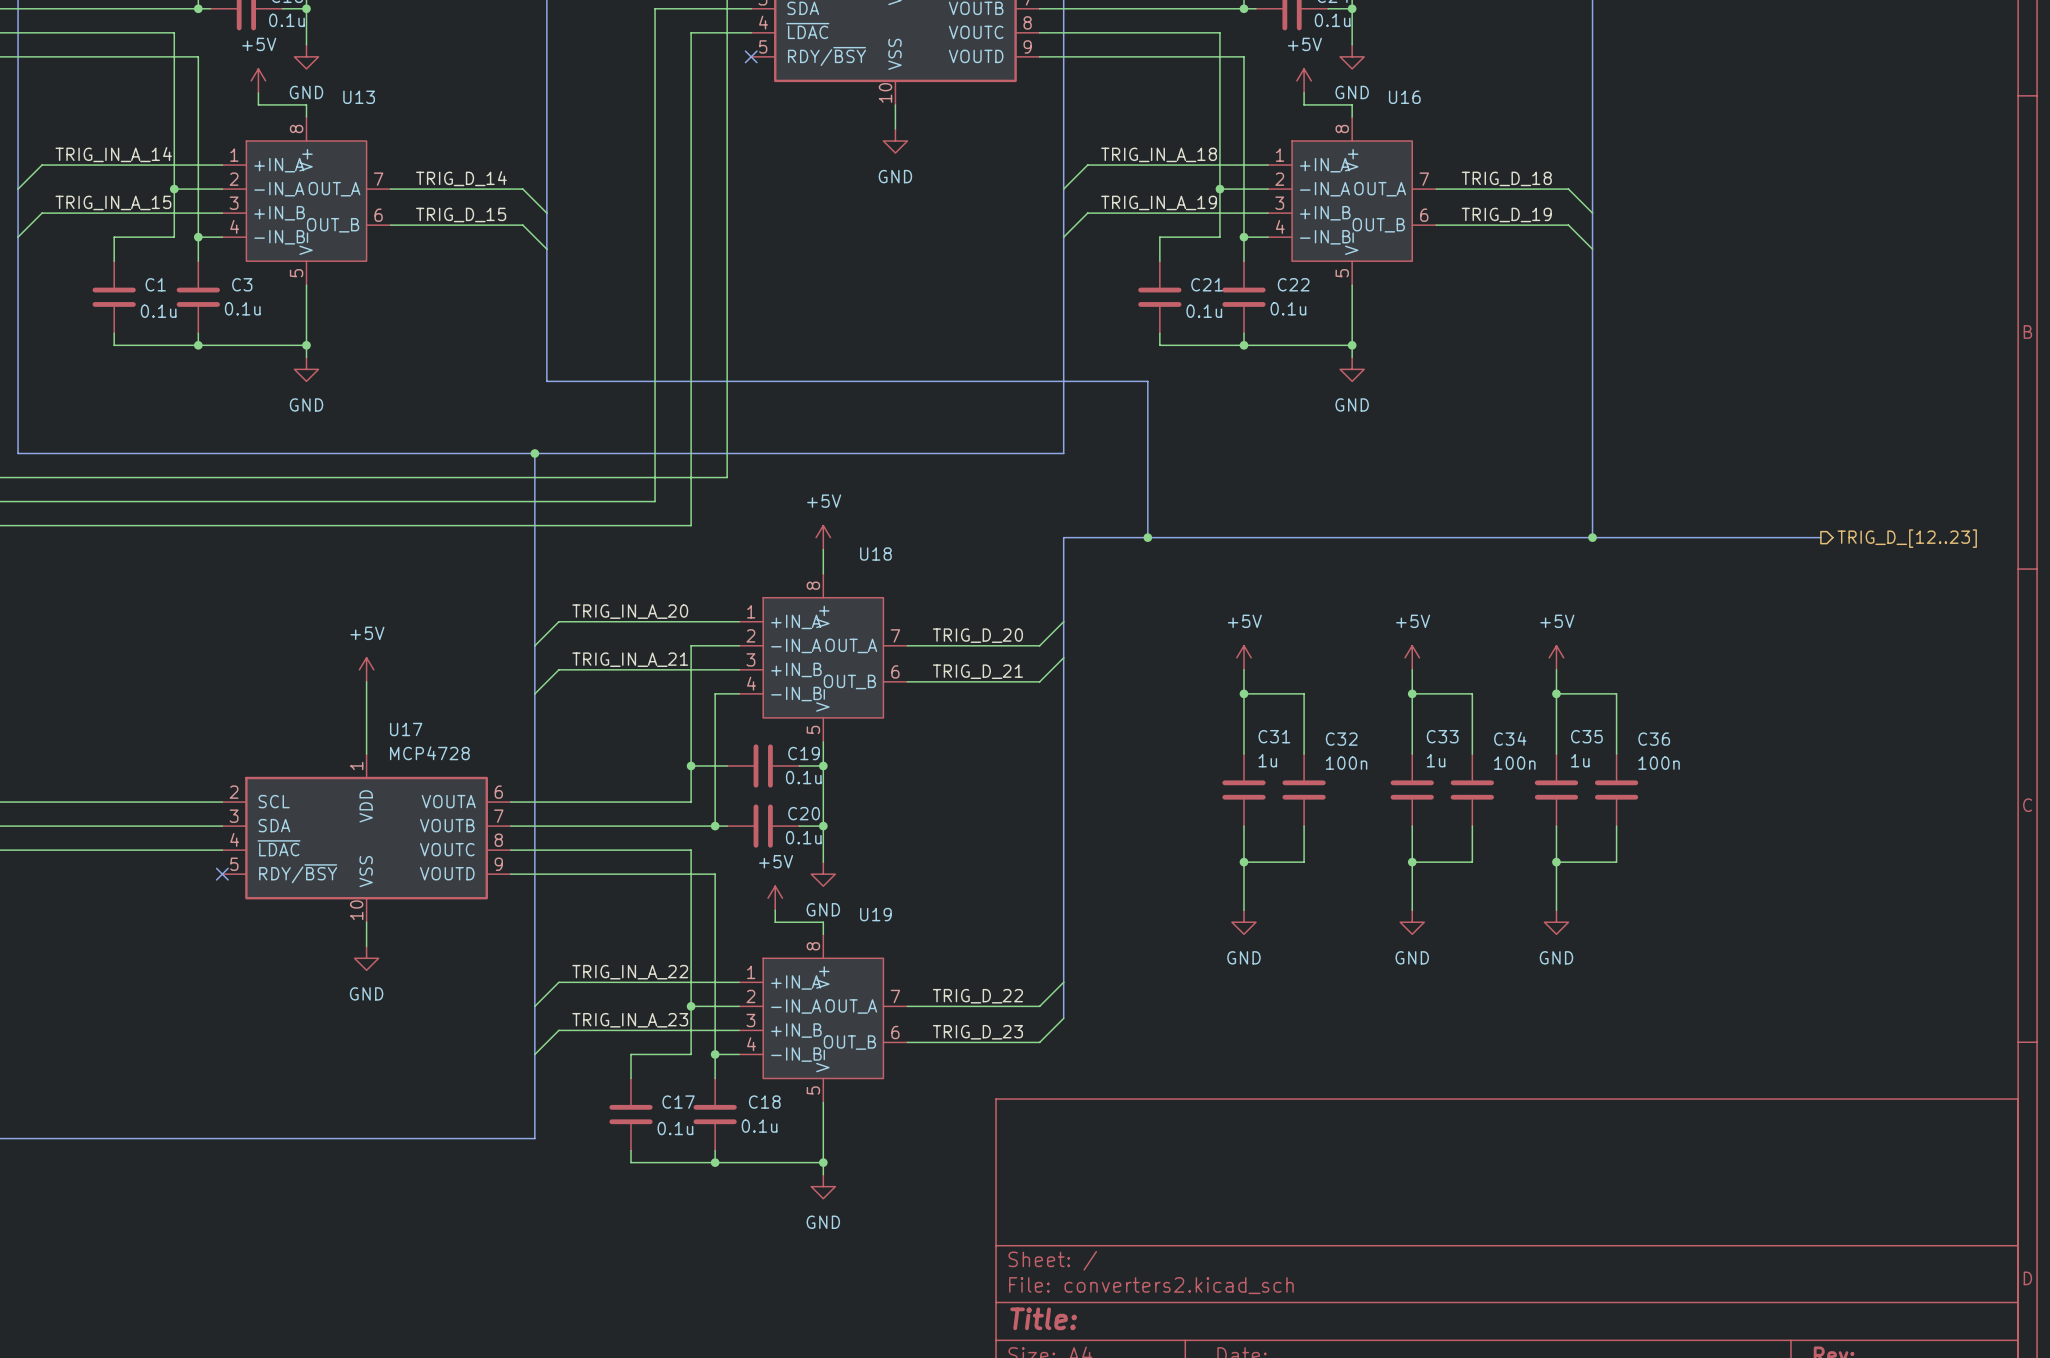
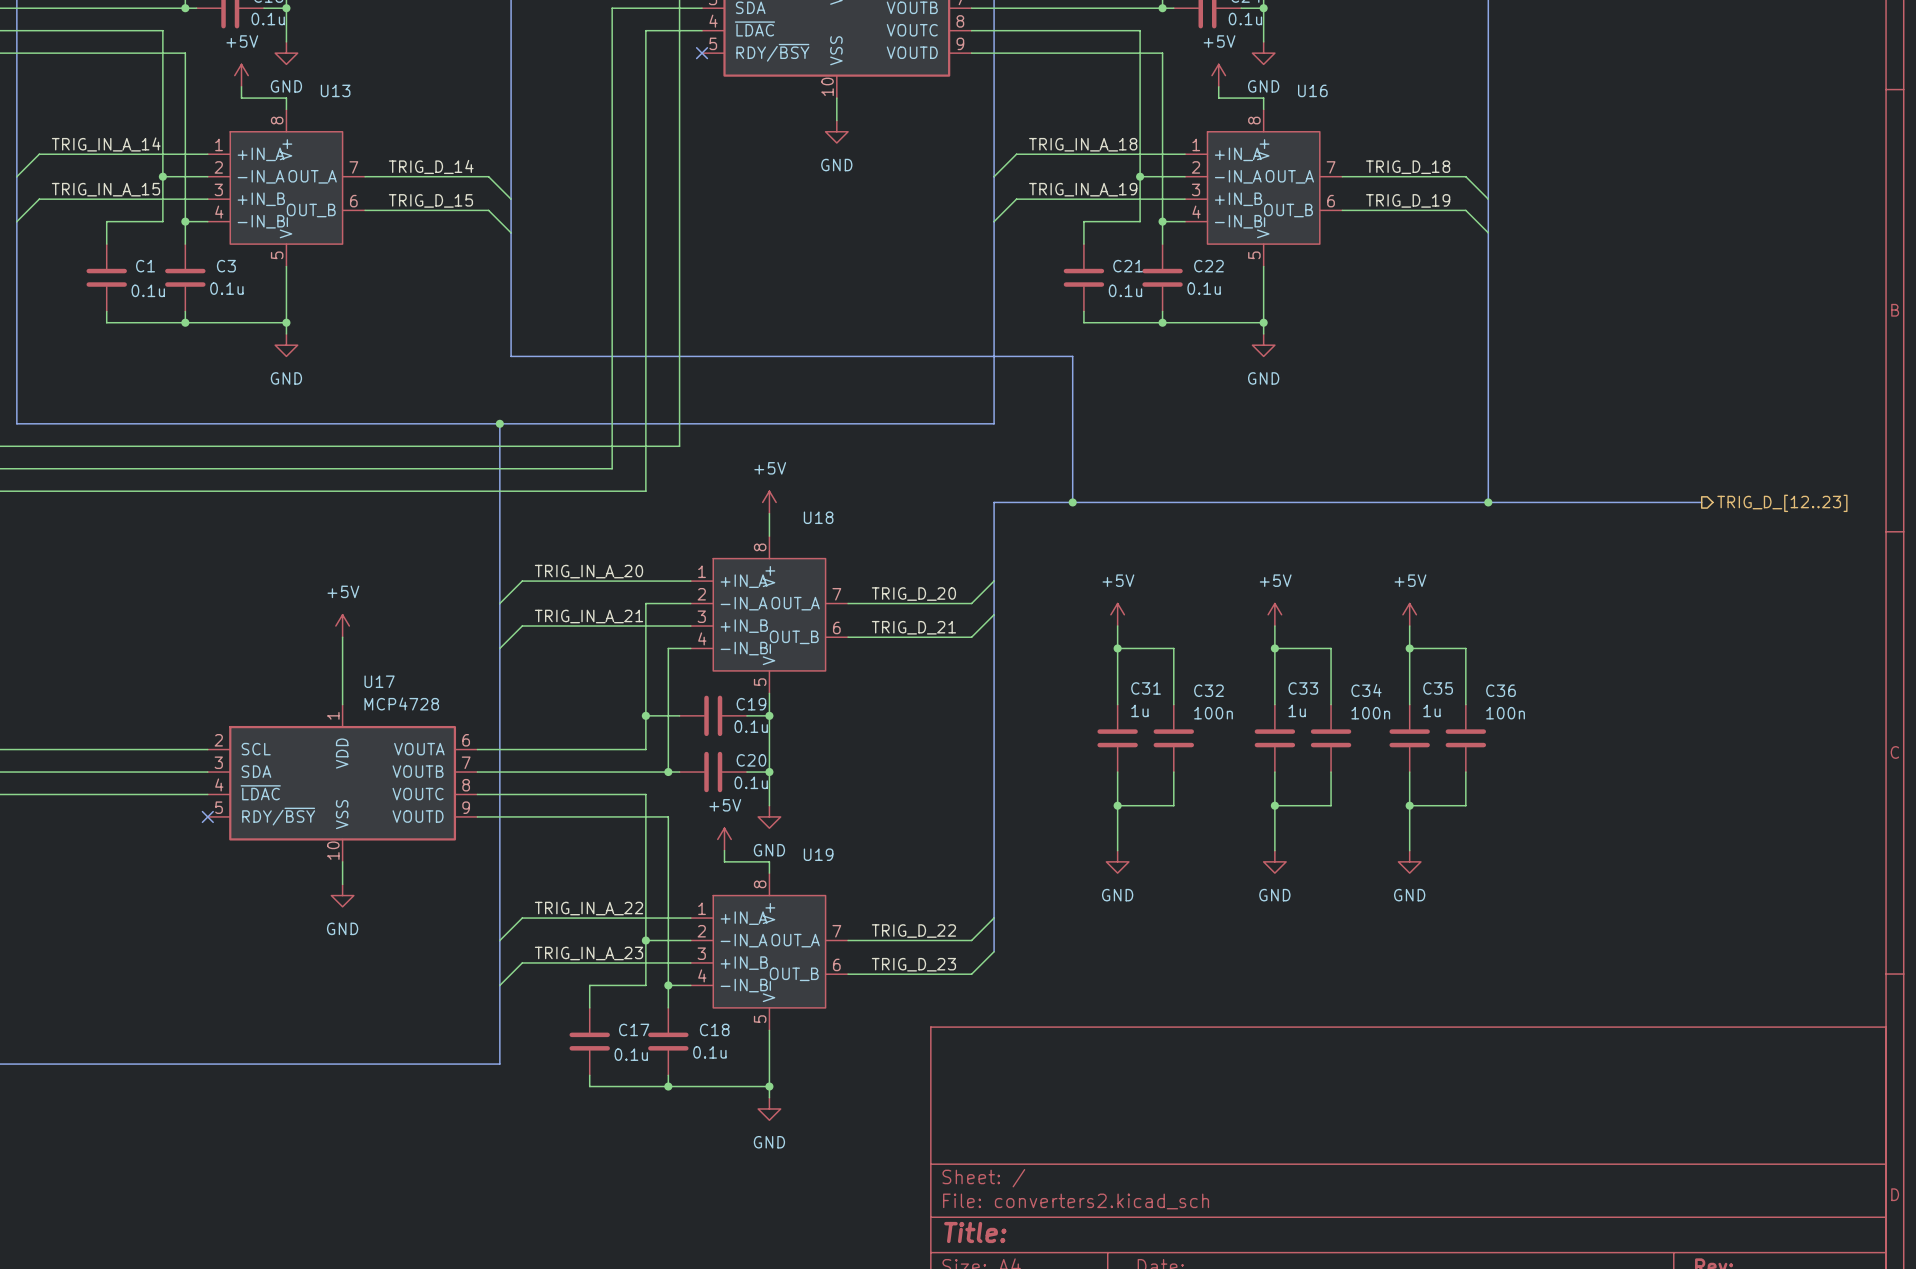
power symbol position: +5V (1243, 657) -> +5V (1117, 614)
power symbol: none -> +5V (1274, 614)
power symbol: +5V (1412, 657) -> none
power symbol: none -> +5V (1409, 614)
power symbol: +5V (1556, 657) -> none
wire: (1243, 669) (1243, 753) -> (1117, 626) (1117, 704)
wire: (1412, 669) (1412, 753) -> (1274, 626) (1274, 704)
wire: (1556, 669) (1556, 753) -> (1409, 626) (1409, 704)
wire: none -> (1117, 648) (1162, 648)
junction position: (1243, 693) -> (1117, 648)
wire: (1256, 693) (1304, 693) (1304, 753) -> (1173, 648) (1173, 704)
wire: none -> (1274, 648) (1319, 648)
junction: none -> (1274, 648)
junction: (1412, 693) -> none
wire: (1424, 693) (1472, 693) (1472, 753) -> (1331, 648) (1331, 704)
wire: none -> (1409, 648) (1454, 648)
junction: none -> (1409, 648)
junction: (1556, 693) -> none
wire: (1568, 693) (1616, 693) (1616, 753) -> (1465, 648) (1465, 704)
C31 position: (1243, 790) -> (1117, 738)
C32 position: (1304, 790) -> (1173, 738)
C33 position: (1412, 790) -> (1274, 738)
C34 position: (1472, 790) -> (1331, 738)
C35 position: (1556, 790) -> (1409, 738)
C36 position: (1616, 790) -> (1465, 738)
wire: (1243, 826) (1243, 910) -> (1117, 772) (1117, 850)
wire: (1304, 826) (1304, 862) (1256, 862) -> (1173, 772) (1173, 805)
wire: (1412, 826) (1412, 910) -> (1274, 772) (1274, 850)
wire: (1472, 826) (1472, 862) (1424, 862) -> (1331, 772) (1331, 805)
wire: (1556, 826) (1556, 910) -> (1409, 772) (1409, 850)
wire: (1616, 826) (1616, 862) (1568, 862) -> (1465, 772) (1465, 805)
wire: none -> (1117, 805) (1162, 805)
junction position: (1243, 862) -> (1117, 805)
wire: none -> (1274, 805) (1319, 805)
junction: none -> (1274, 805)
junction: (1412, 862) -> none
wire: none -> (1409, 805) (1454, 805)
junction: none -> (1409, 805)
junction: (1556, 862) -> none
power symbol position: GND (1243, 922) -> GND (1117, 861)
power symbol: none -> GND (1274, 861)
power symbol: GND (1412, 922) -> none
power symbol: none -> GND (1409, 861)
power symbol: GND (1556, 922) -> none

